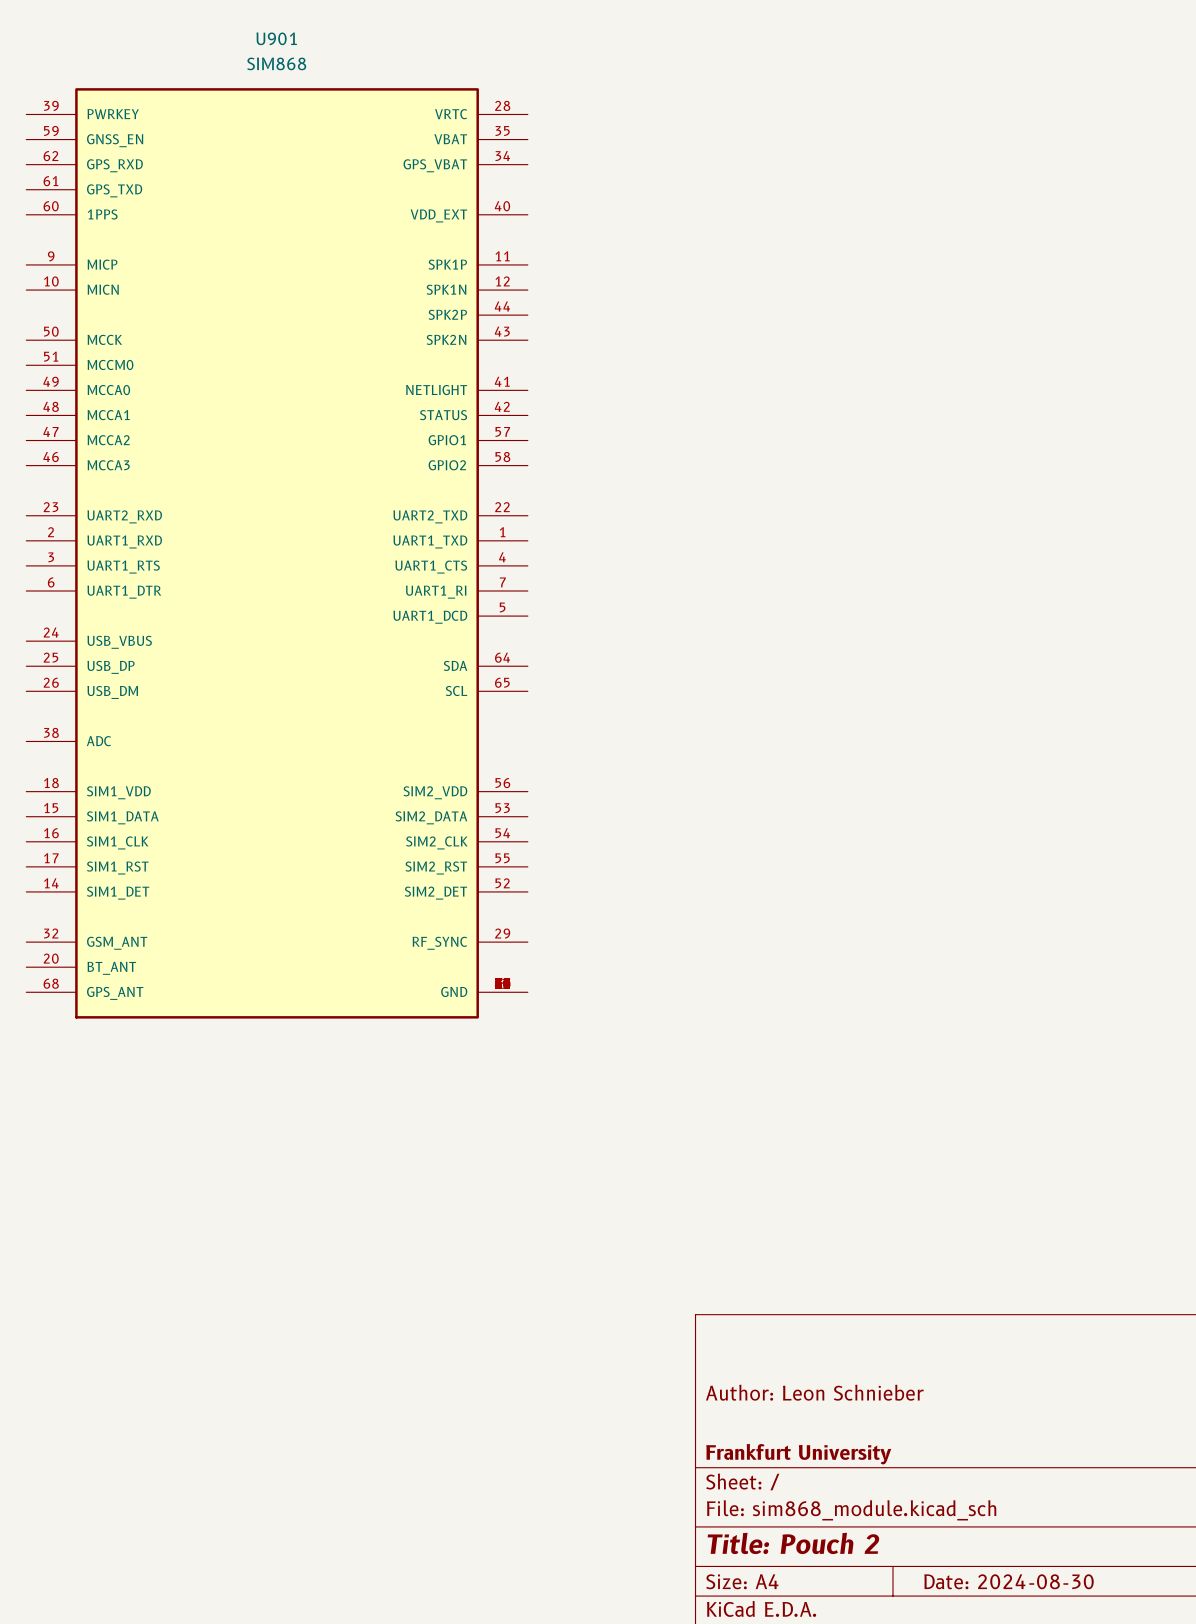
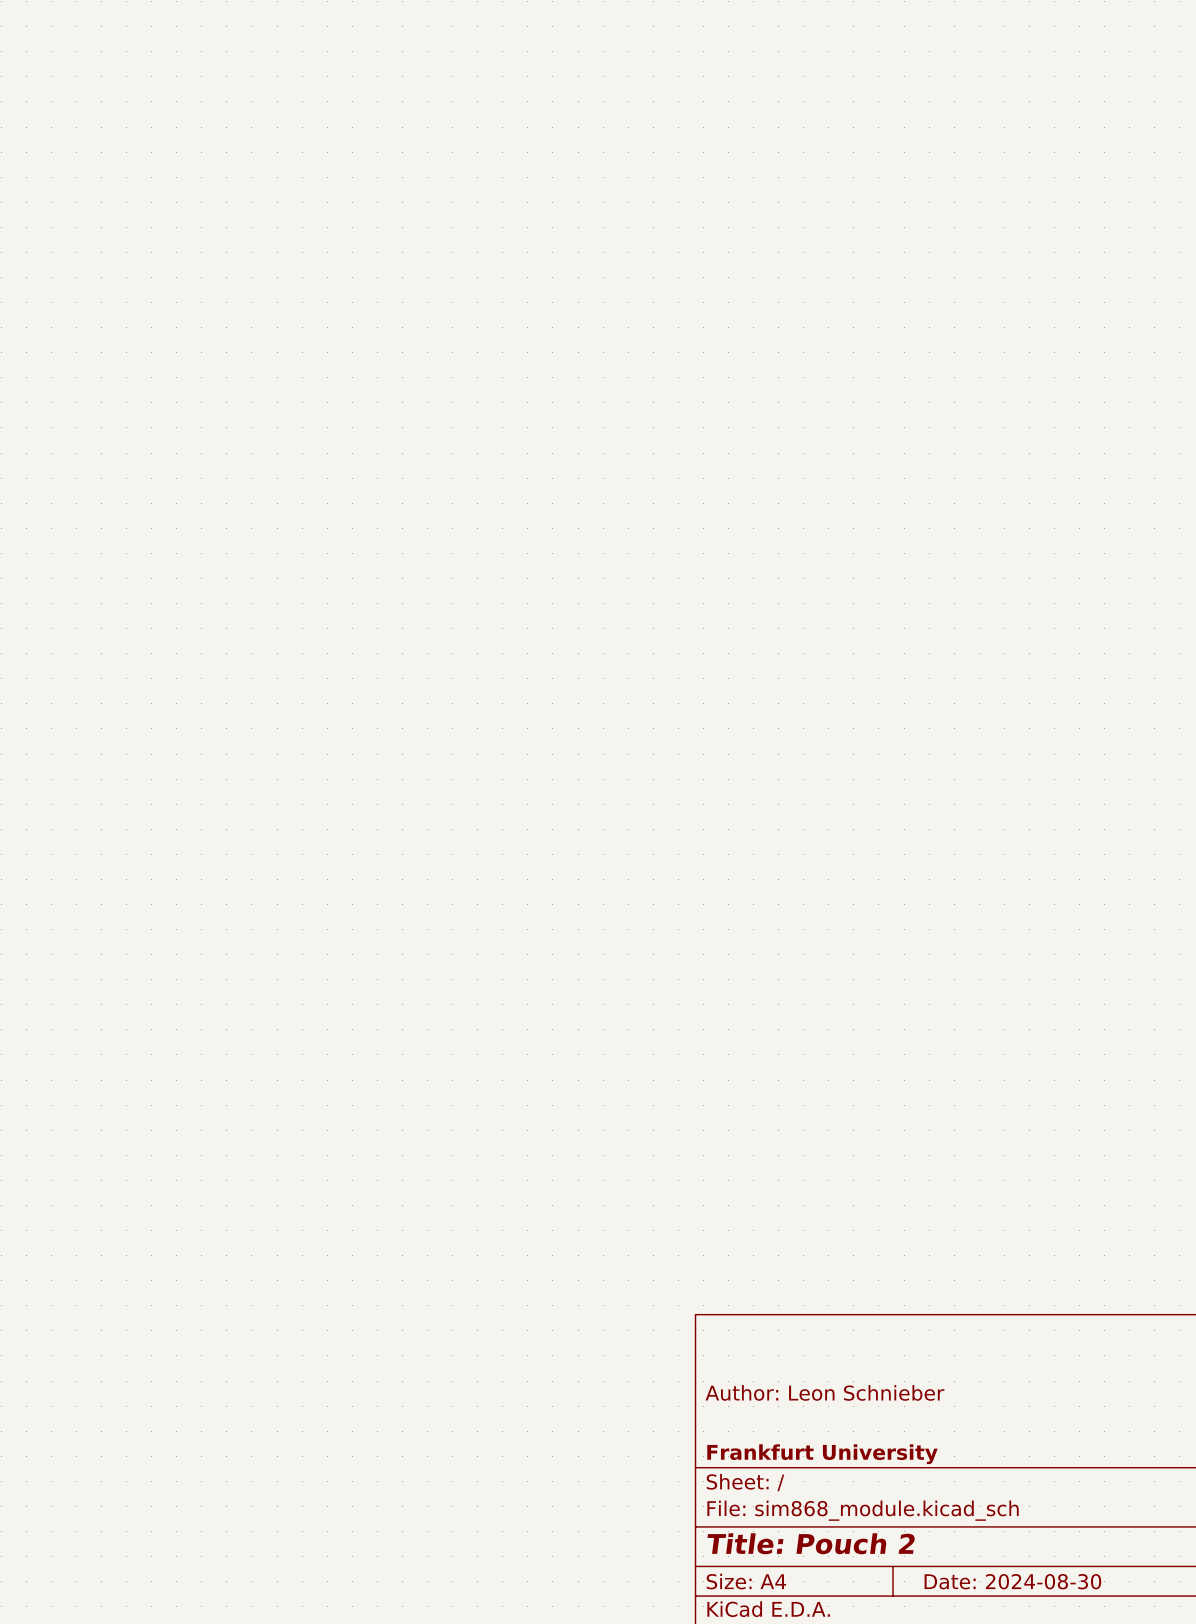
U901: SIM868 (277, 553) -> none

